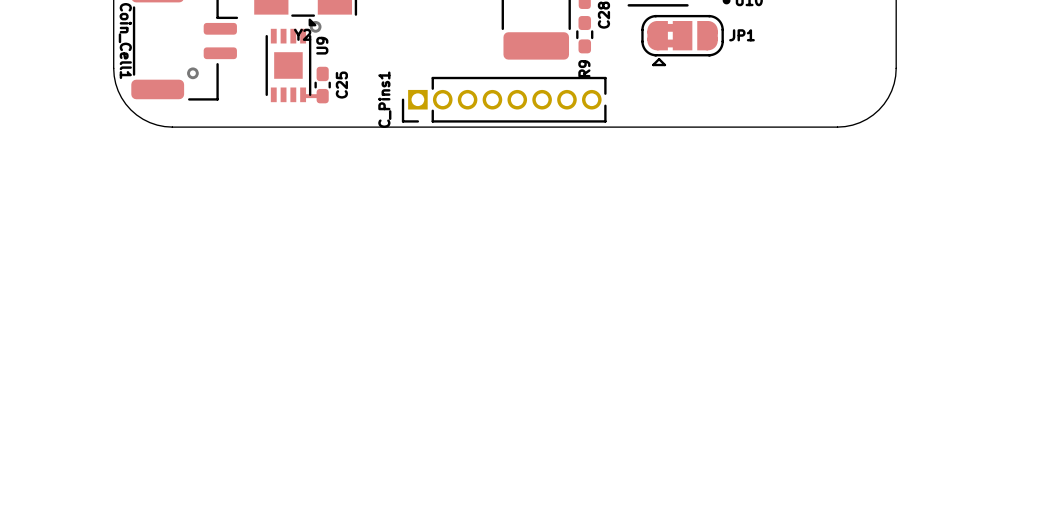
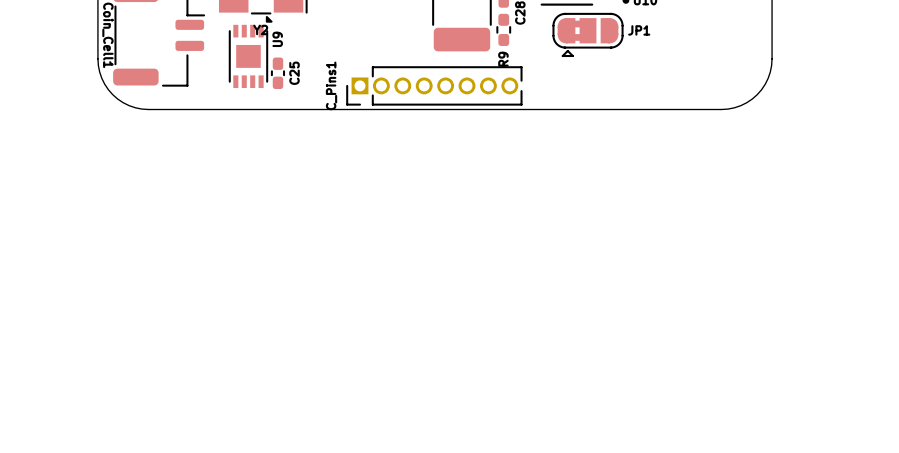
via: (315, 26) -> none
via: (192, 73) -> none
track: (303, 94) (322, 96) -> none

